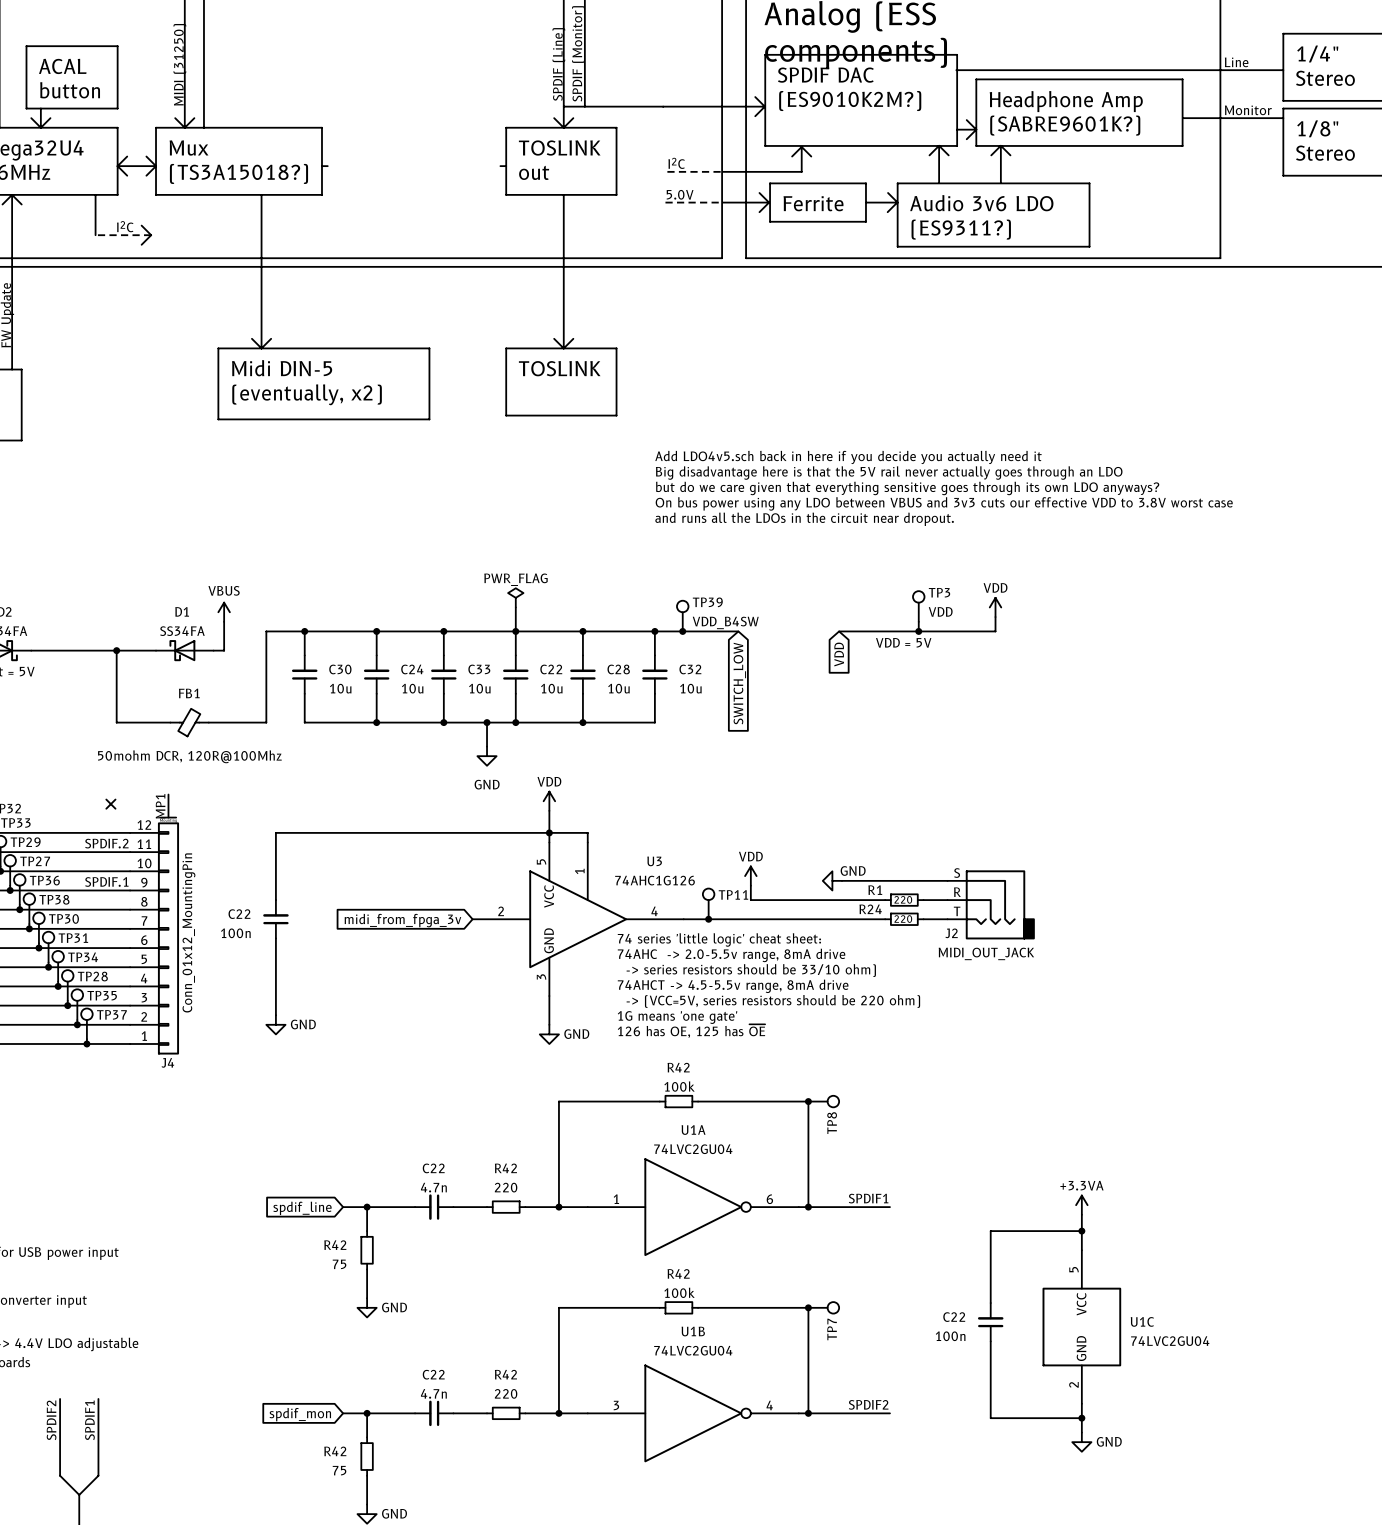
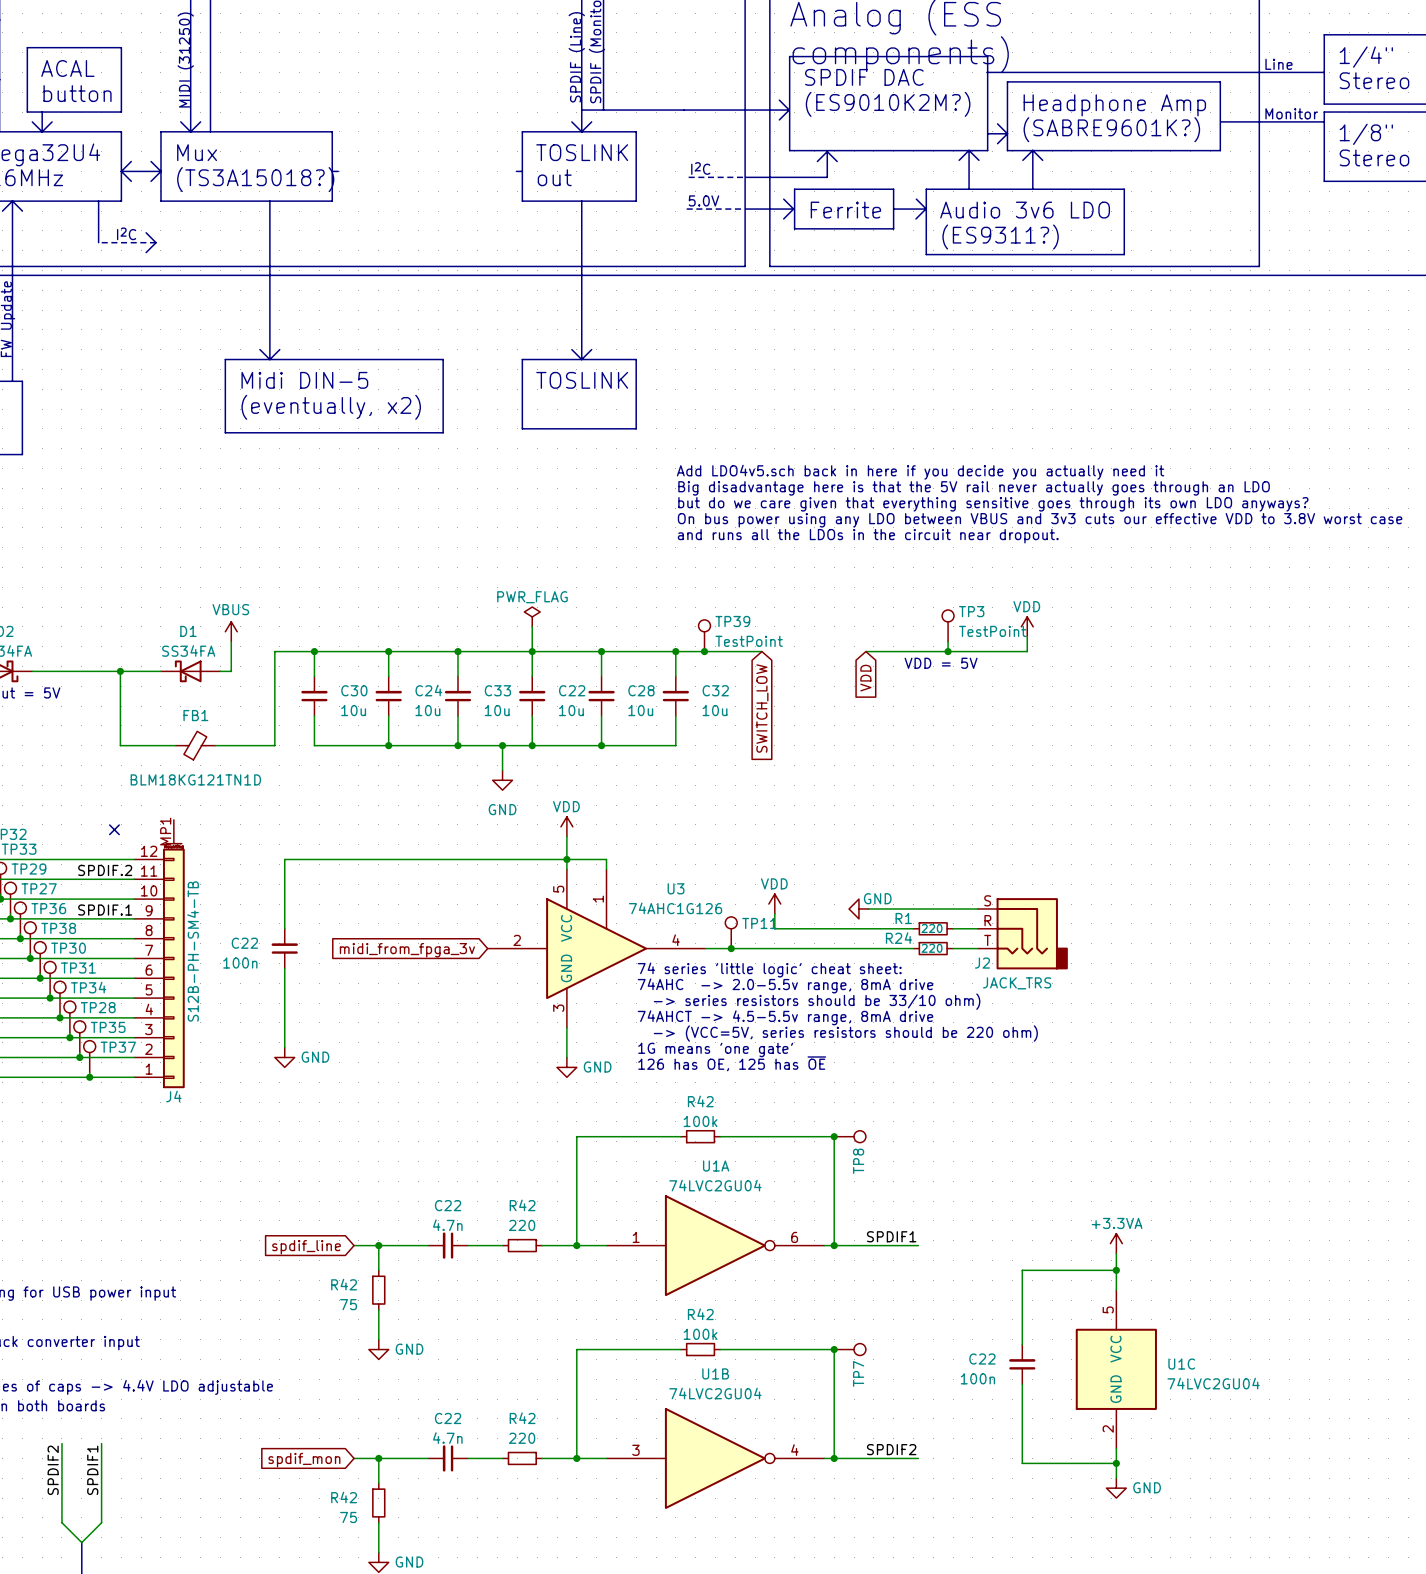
TP3 value: VDD (940, 611) -> TestPoint (992, 631)
TP39 value: VDD_B4SW (725, 622) -> TestPoint (749, 641)
FB1 value: 50mohm DCR, 120R@100Mhz (189, 756) -> BLM18KG121TN1D (195, 779)
J4 value: Conn_01x12_MountingPin (188, 932) -> S12B-PH-SM4-TB (193, 951)
J2 value: MIDI_OUT_JACK (986, 953) -> JACK_TRS (1017, 983)

